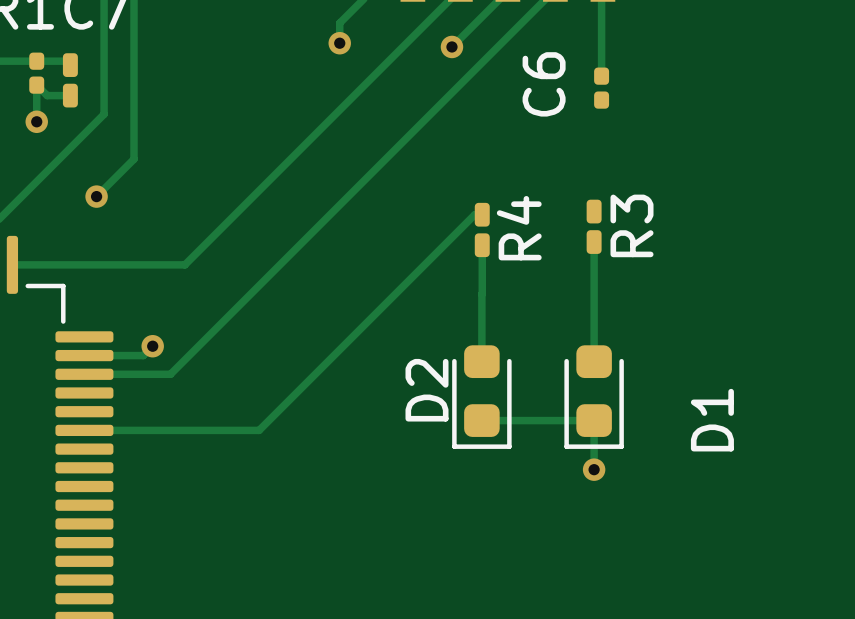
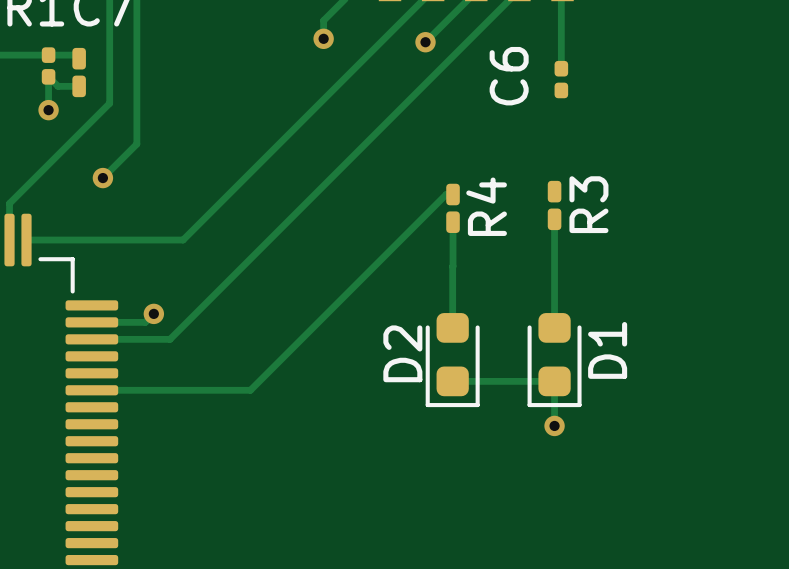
D1 name position: D1 (712, 420) -> D1 (607, 350)

